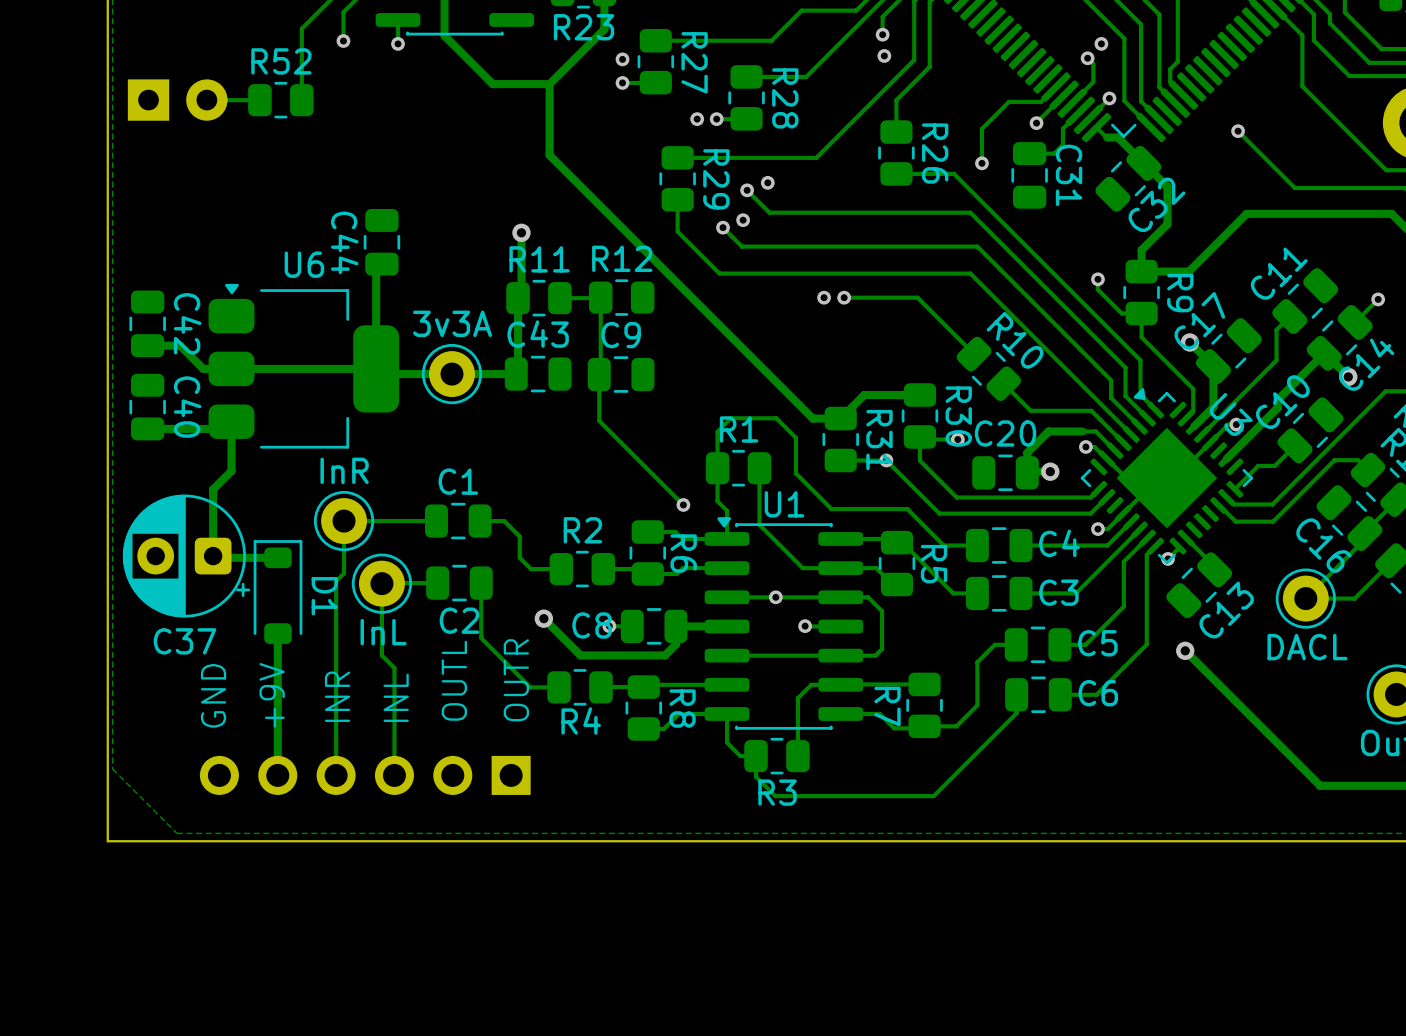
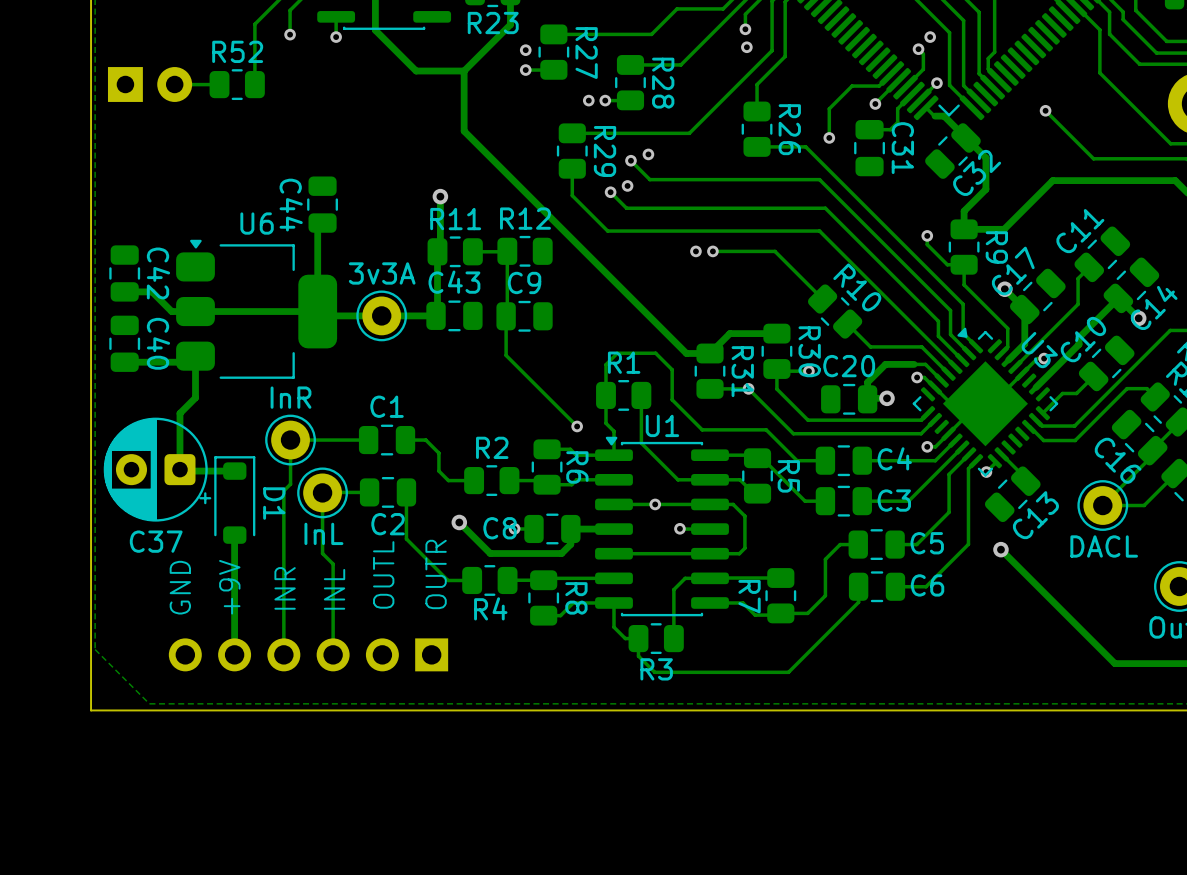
track: (1378, 299) (1355, 322) -> none
via: (1378, 299) -> none

